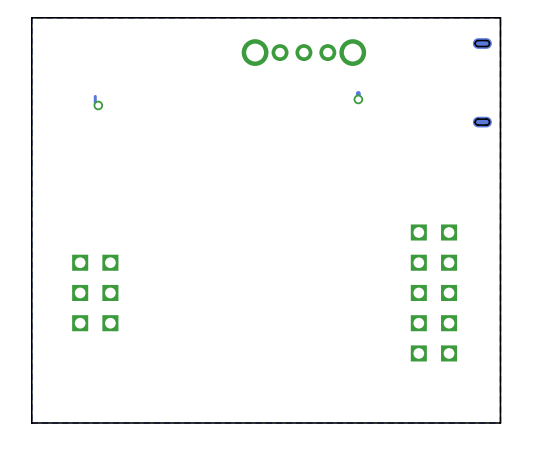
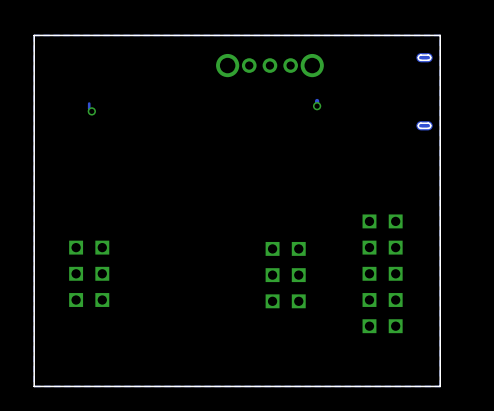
part: none -> (285, 275)

